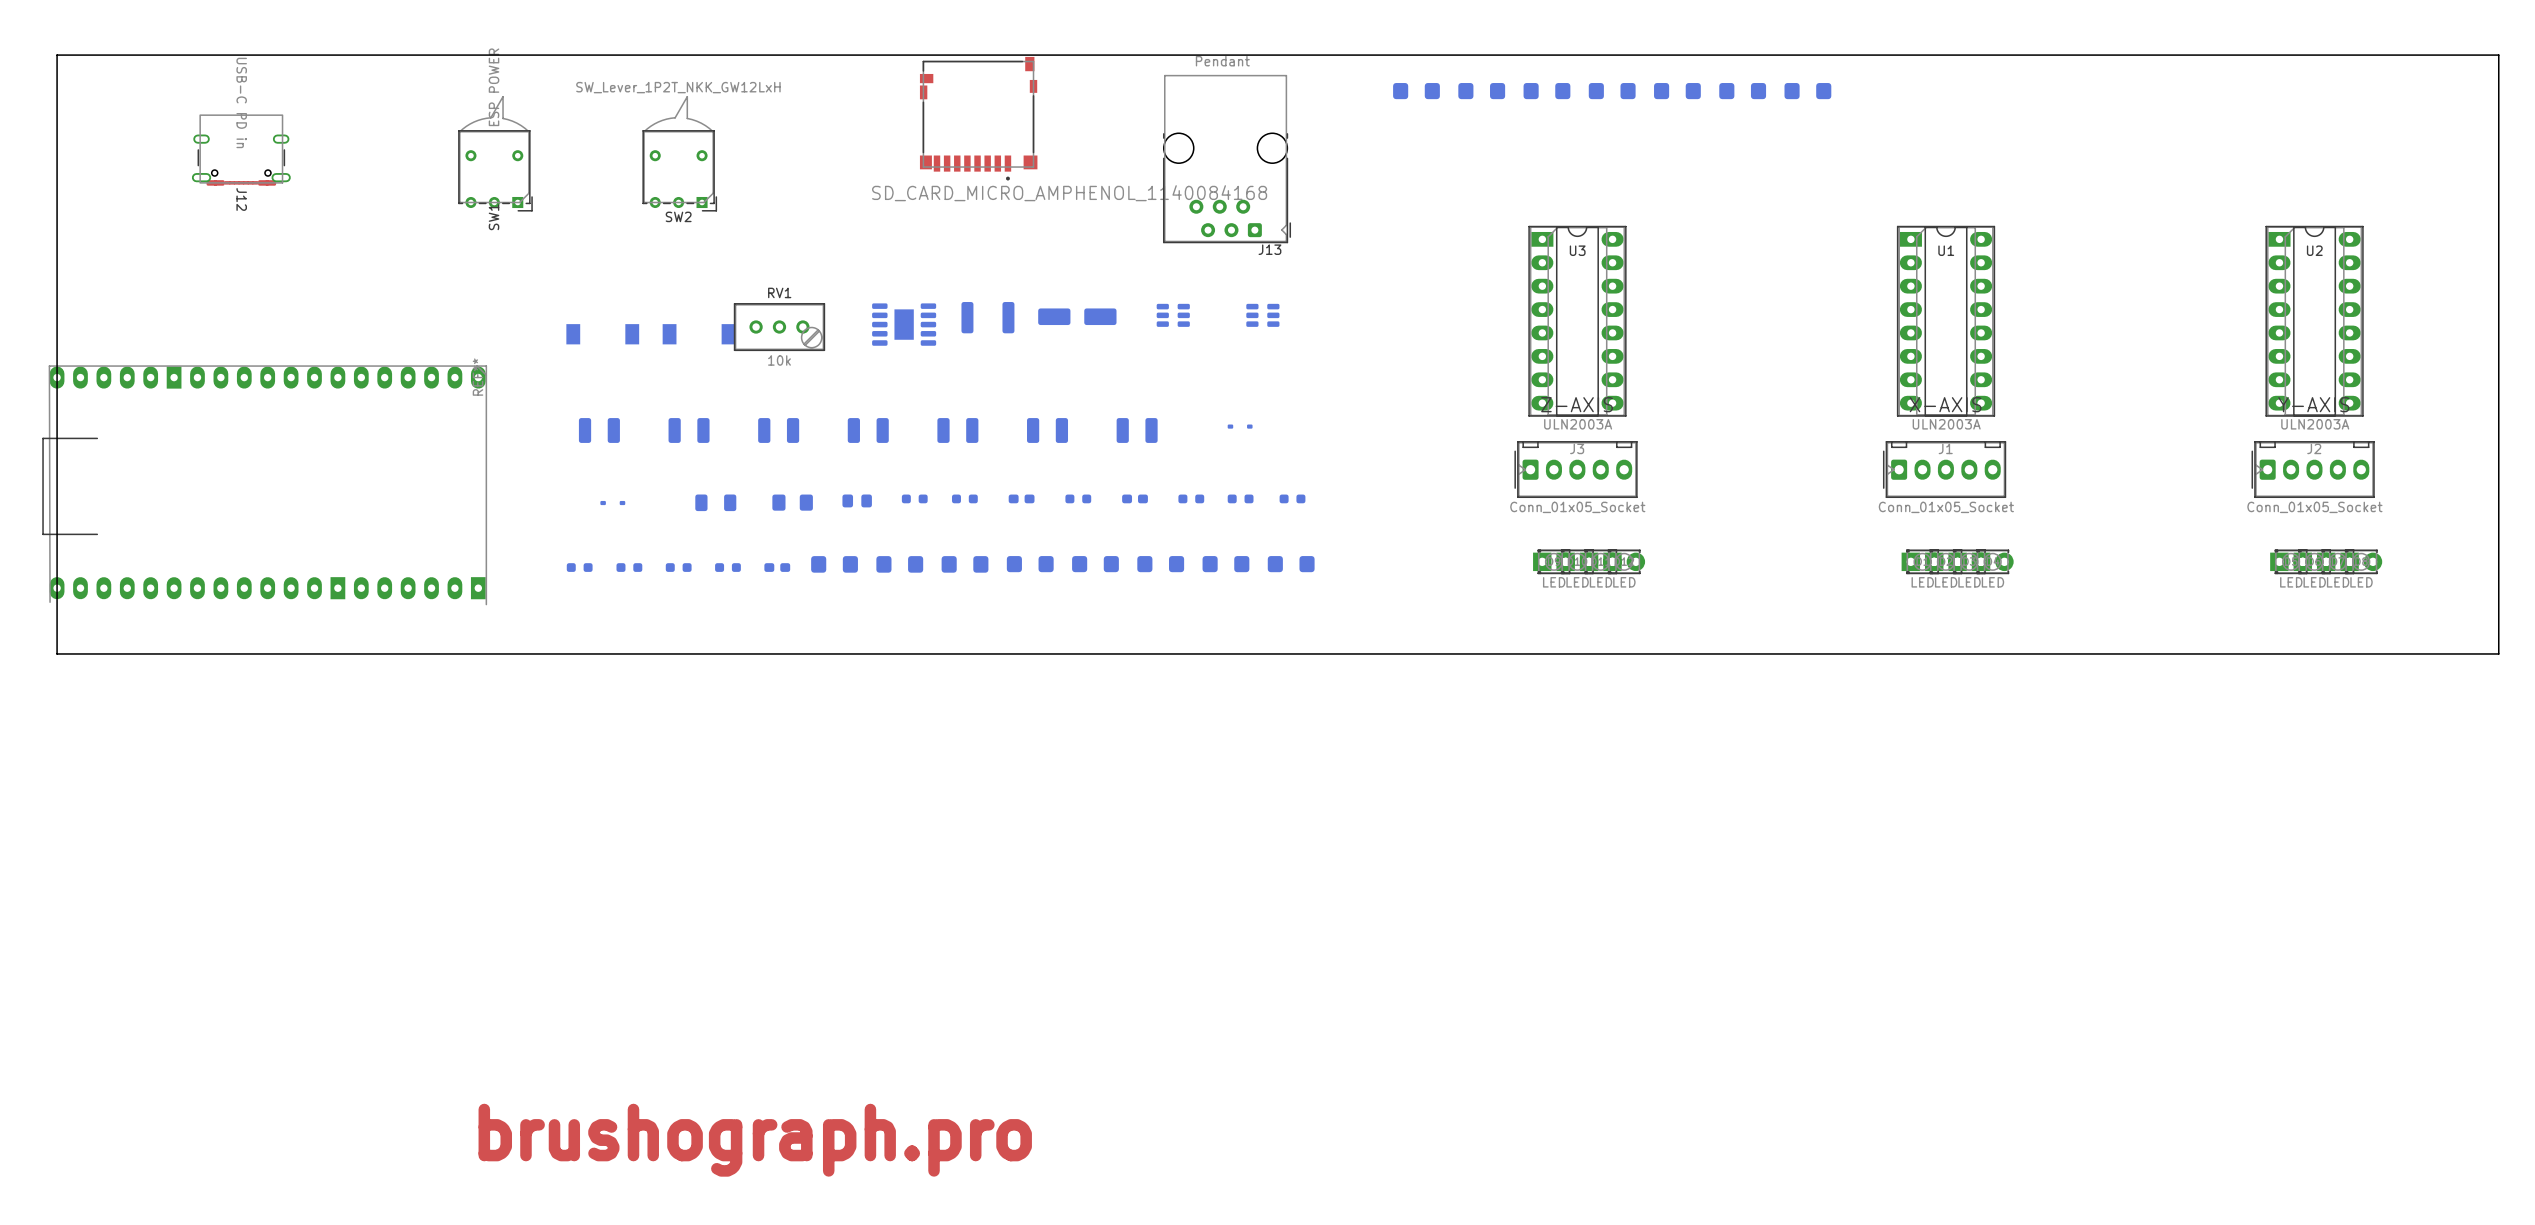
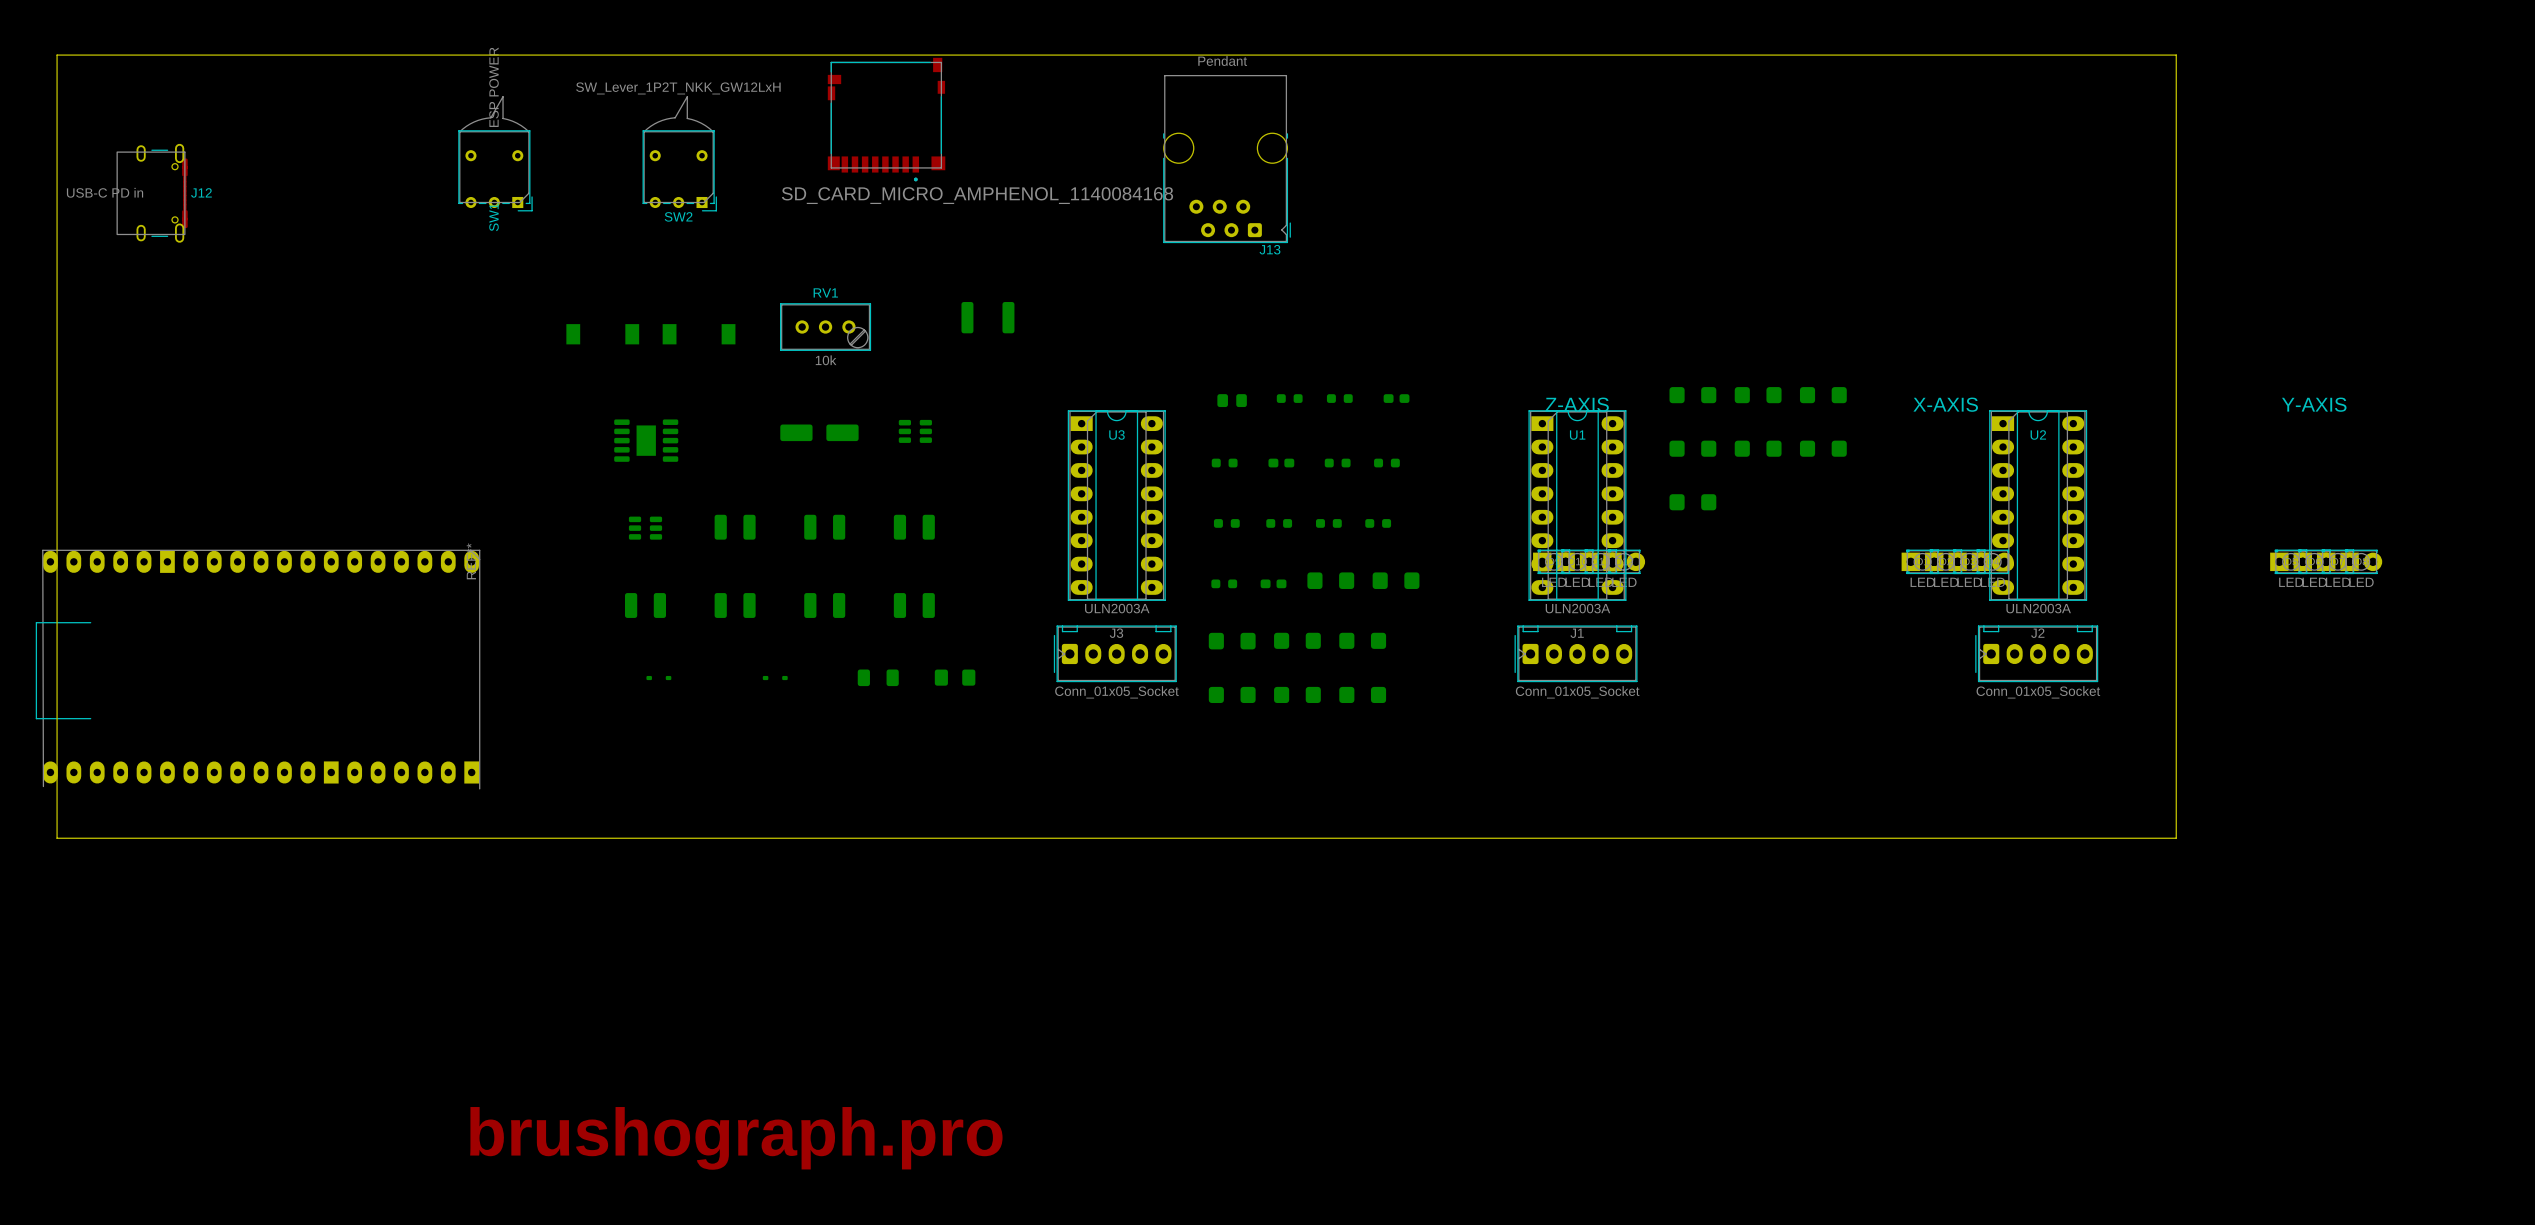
board edge: (2176, 55) (2498, 55) (2498, 653) (57, 653) -> (2176, 55) (2176, 838) (57, 838) (57, 653)
part: (1416, 91) -> none
part: (1481, 91) -> none
part: (1546, 91) -> none
part: (1612, 91) -> none
part: (1677, 91) -> none
part: (1742, 91) -> none
part: (1807, 91) -> none
part position: (978, 118) -> (886, 119)
J12 rotation: 0° (241, 150) -> 90° counterclockwise (152, 193)
J12 position: (241, 150) -> (152, 193)
part: (1173, 315) -> none
part: (1262, 315) -> none
part: (1077, 316) -> none
U3 position: (1577, 321) -> (1116, 505)
U1 position: (1946, 321) -> (1577, 505)
U2 position: (2314, 321) -> (2038, 505)
part: (904, 324) -> none
RV1 position: (779, 327) -> (825, 327)
part: none -> (1692, 395)
part: none -> (1758, 395)
part: none -> (1823, 395)
part: none -> (1289, 398)
part: none -> (1339, 398)
part: none -> (1396, 398)
part: none -> (1232, 400)
part: (1240, 426) -> none
part: (599, 430) -> none
part: (689, 430) -> none
part: (778, 430) -> none
part: (868, 430) -> none
part: (957, 430) -> none
part: (1047, 430) -> none
part: (1137, 430) -> none
part: none -> (915, 431)
part: none -> (819, 432)
part: none -> (646, 440)
part: none -> (1692, 448)
part: none -> (1758, 448)
part: none -> (1823, 448)
part: none -> (1224, 463)
part: none -> (1281, 463)
part: none -> (1337, 463)
part: none -> (1386, 463)
J3 position: (1576, 469) -> (1115, 653)
J1 position: (1944, 469) -> (1576, 653)
J2 position: (2313, 469) -> (2036, 653)
part position: (264, 485) -> (258, 669)
part: (914, 498) -> none
part: (964, 498) -> none
part: (1021, 498) -> none
part: (1078, 498) -> none
part: (1135, 498) -> none
part: (1191, 498) -> none
part: (1240, 498) -> none
part: (1292, 498) -> none
part: (857, 500) -> none
part: (715, 502) -> none
part: (792, 502) -> none
part: none -> (1692, 502)
part: (612, 503) -> none
part: none -> (1226, 523)
part: none -> (1279, 523)
part: none -> (1328, 523)
part: none -> (1378, 523)
part: none -> (735, 527)
part: none -> (824, 527)
part: none -> (914, 527)
part: none -> (645, 528)
part: (834, 564) -> none
part: (899, 564) -> none
part: (965, 564) -> none
part: (1030, 564) -> none
part: (1095, 564) -> none
part: (1160, 564) -> none
part: (1225, 564) -> none
part: (1291, 564) -> none
part: (579, 567) -> none
part: (629, 567) -> none
part: (678, 567) -> none
part: (727, 567) -> none
part: (777, 567) -> none
part: none -> (1330, 580)
part: none -> (1396, 580)
part: none -> (1224, 583)
part: none -> (1273, 583)
part: none -> (645, 605)
part: none -> (735, 605)
part: none -> (824, 605)
part: none -> (914, 605)
part: none -> (1297, 640)
part: none -> (1362, 640)
part: none -> (1232, 641)
part: none -> (878, 677)
part: none -> (955, 677)
part: none -> (658, 678)
part: none -> (775, 678)
part: none -> (1232, 694)
part: none -> (1297, 694)
part: none -> (1362, 694)

